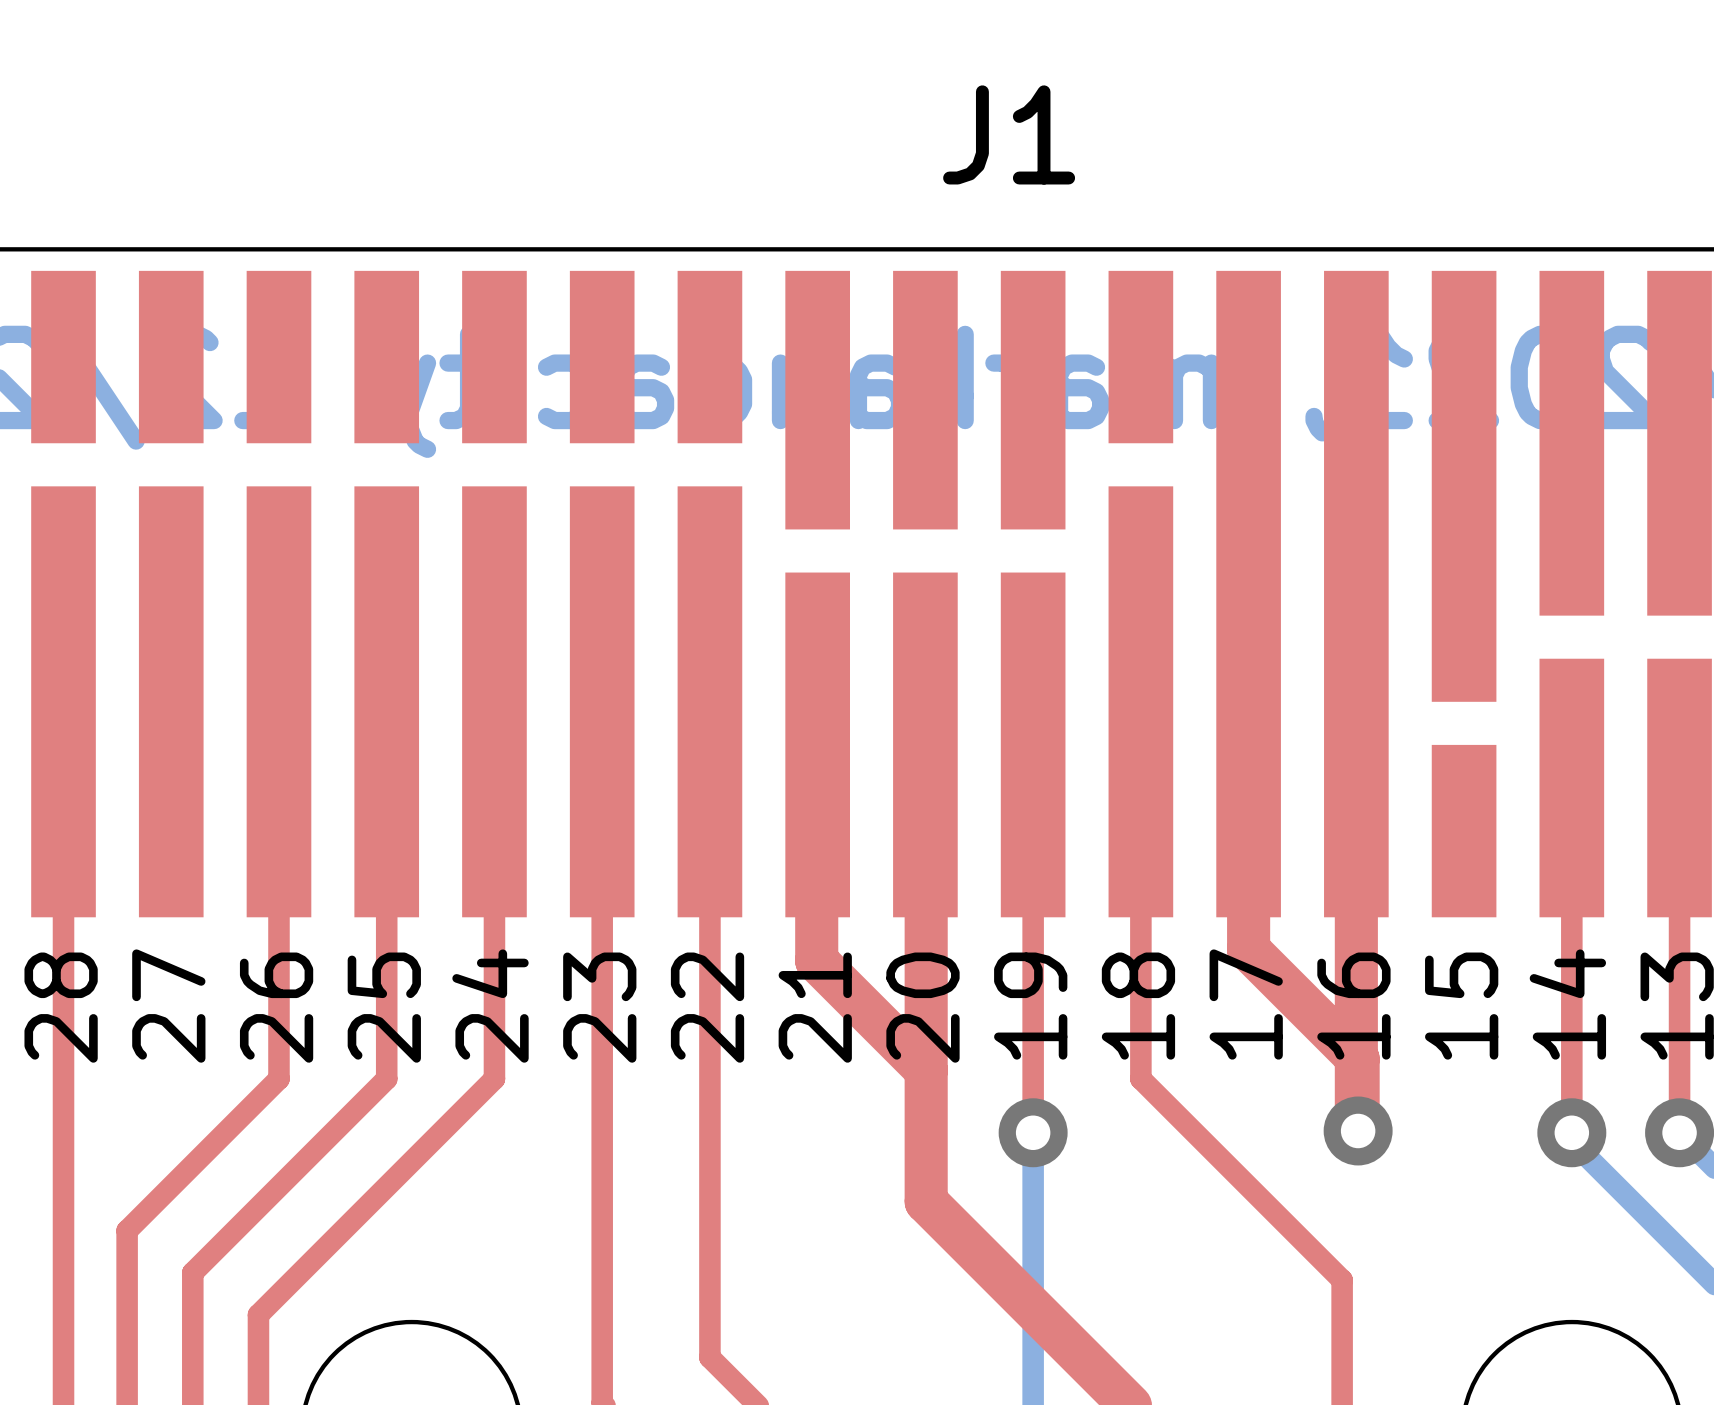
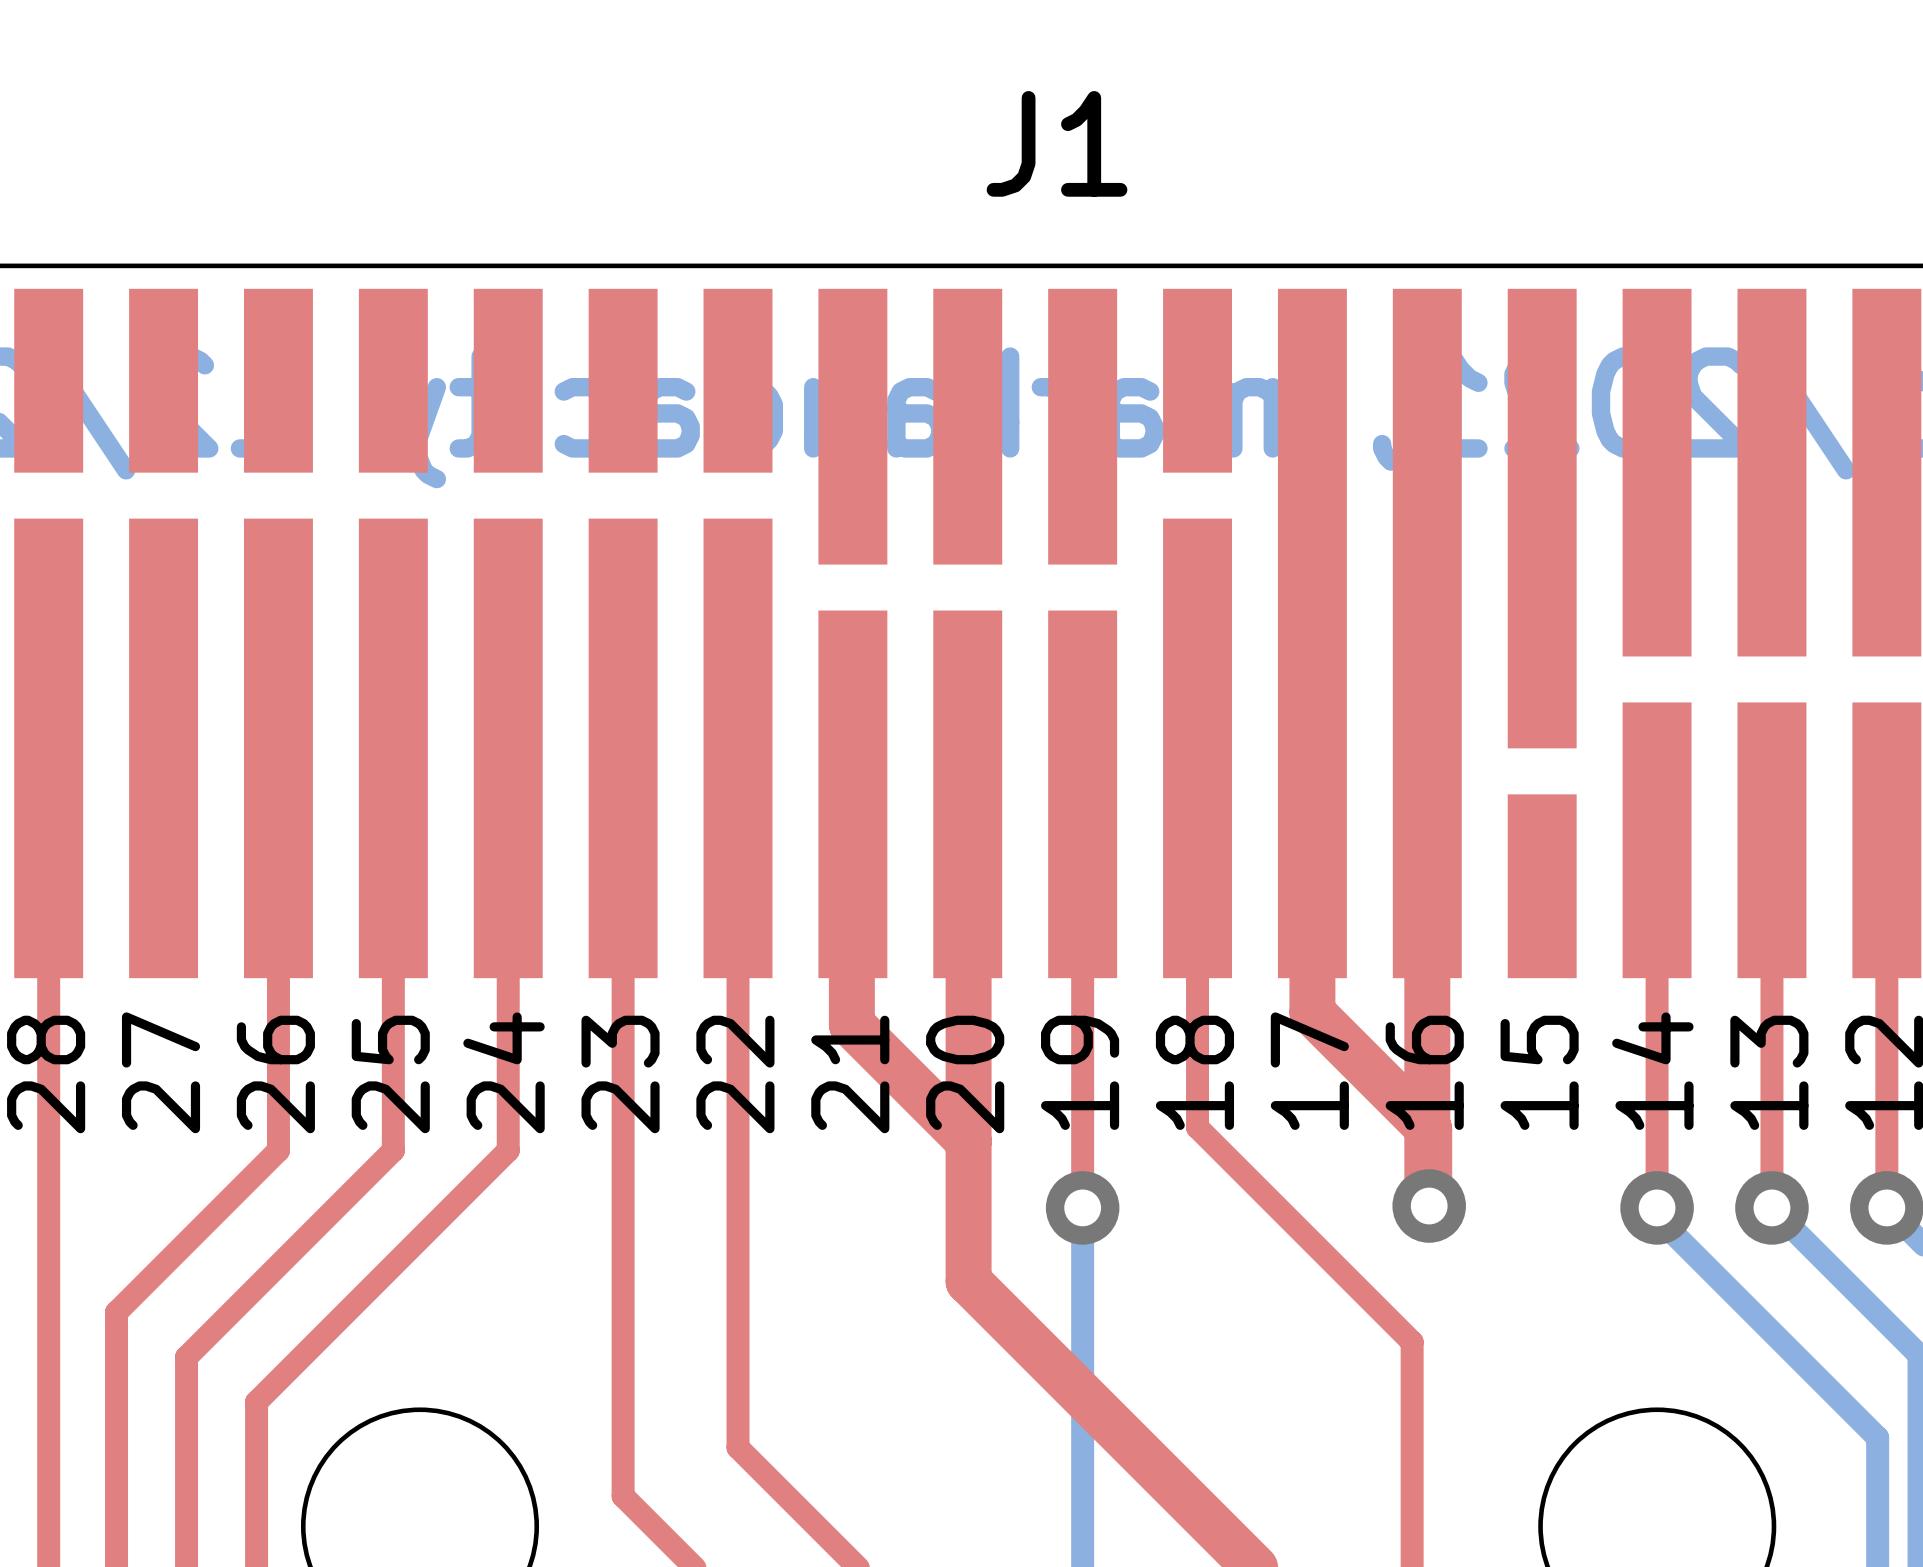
top track: (1140, 1057) (1140, 1078) (1342, 1280) -> (1197, 1127) (1412, 1342) (1412, 1365)

